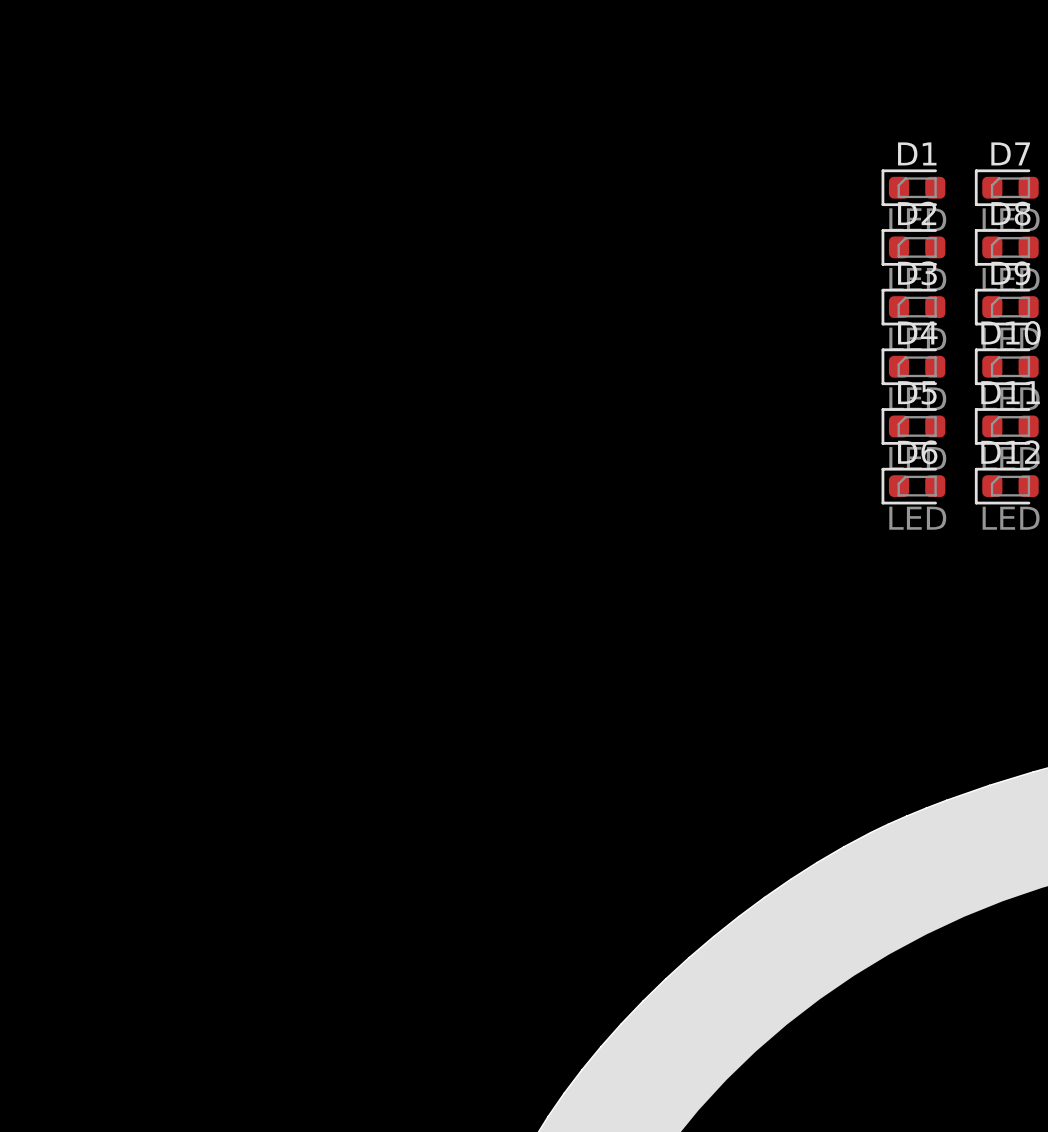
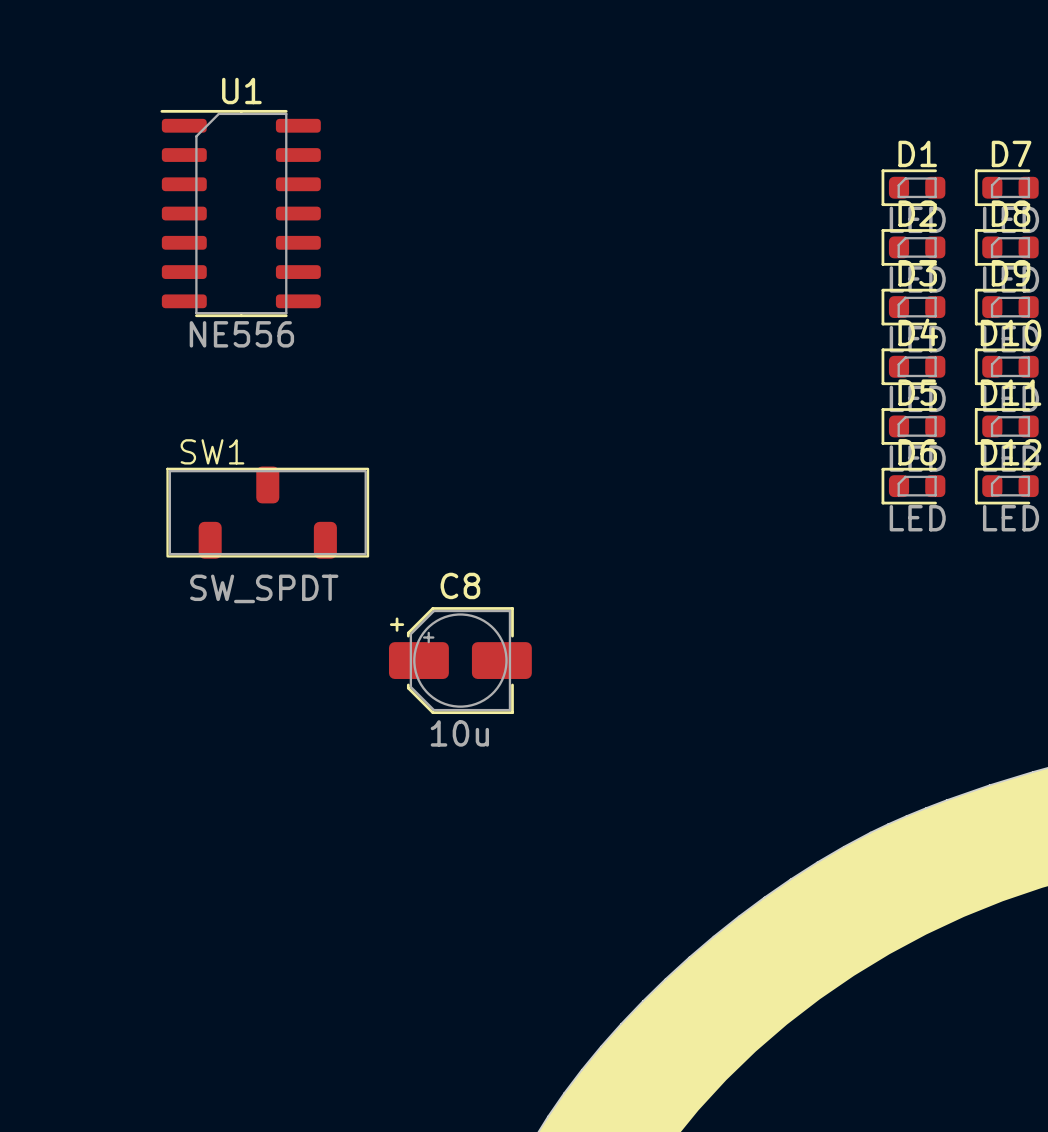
U1: none -> NE556 (240, 213)
SW1: none -> SW_SPDT (267, 512)
C8: none -> 10u (460, 660)

